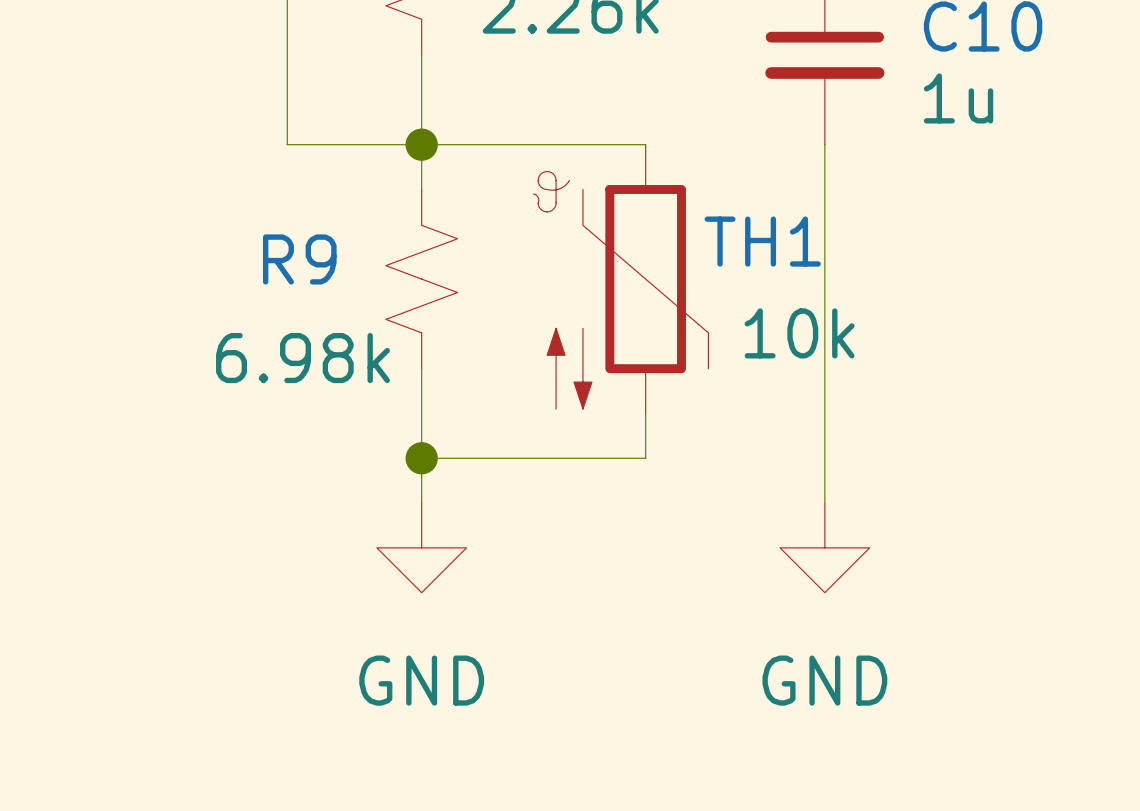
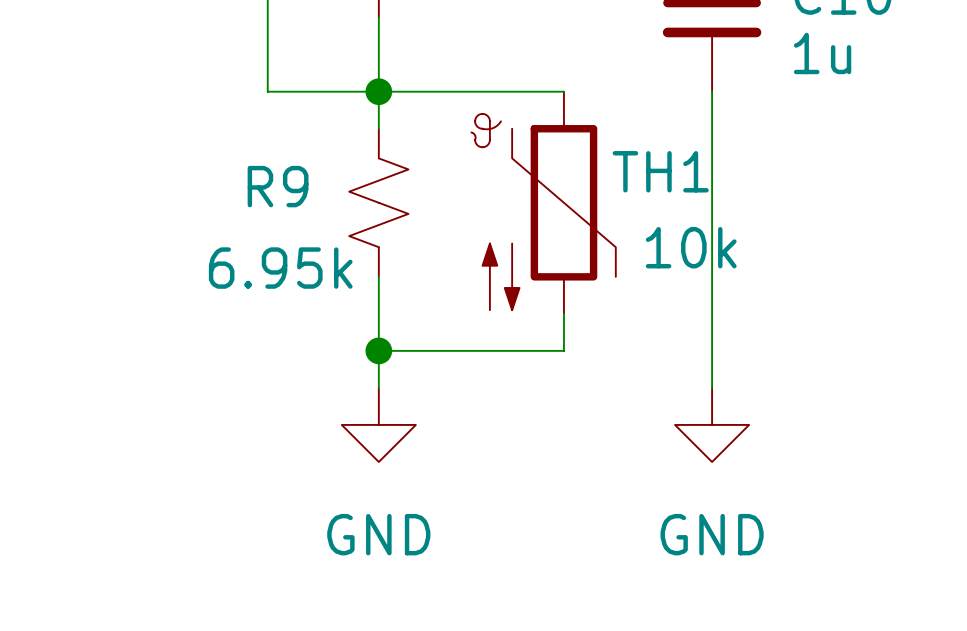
R9 value: 6.98k (302, 358) -> 6.95k (280, 268)

